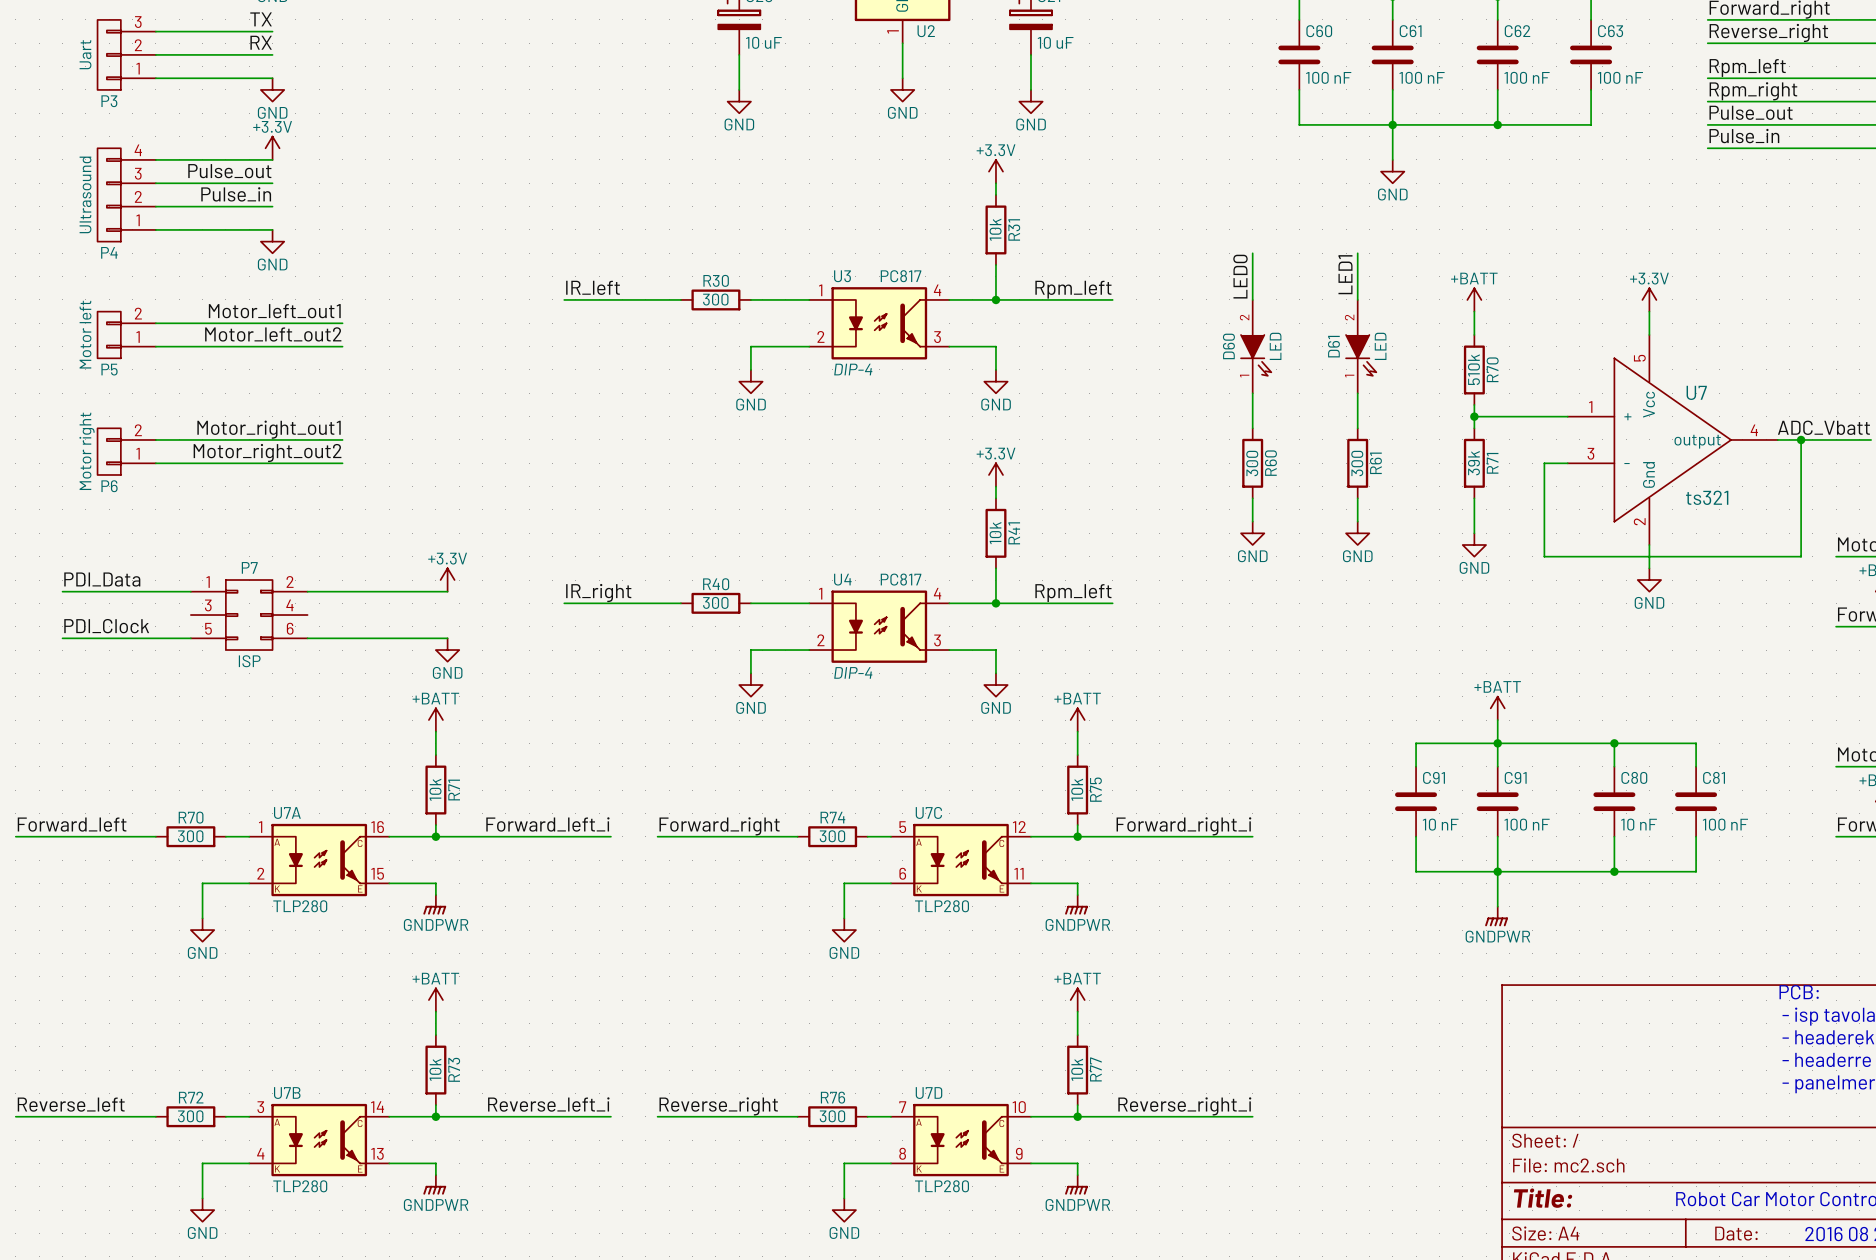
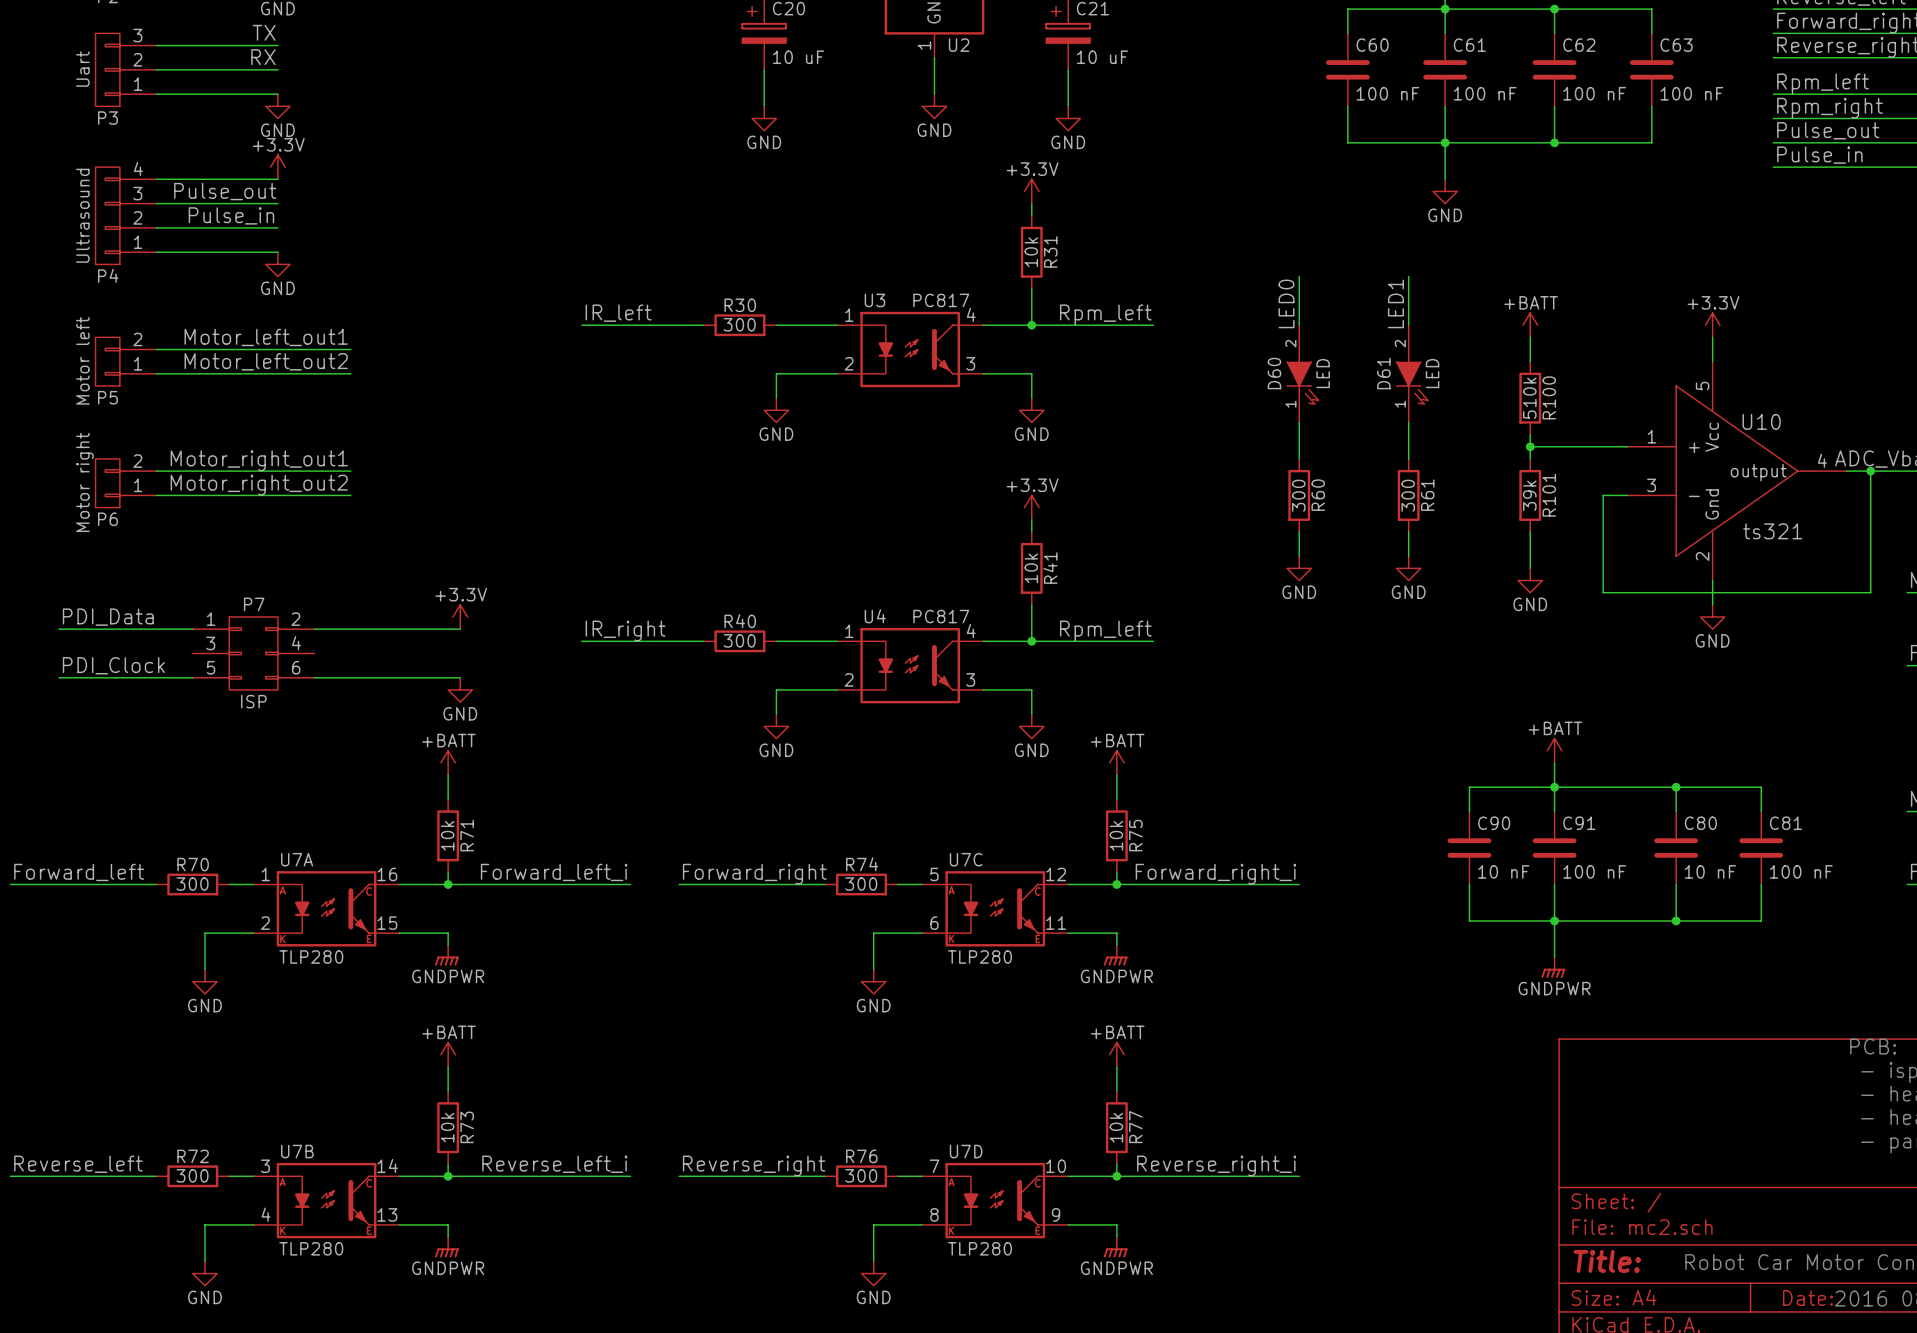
U3 text: DIP-4 (853, 369) -> none
R70 name: R70 (1492, 369) -> R100 (1549, 397)
U7 name: U7 (1696, 392) -> U10 (1761, 421)
R71 name: R71 (1492, 463) -> R101 (1549, 495)
U4 text: DIP-4 (853, 672) -> none
C91 name: C91 (1434, 777) -> C90 (1494, 823)

